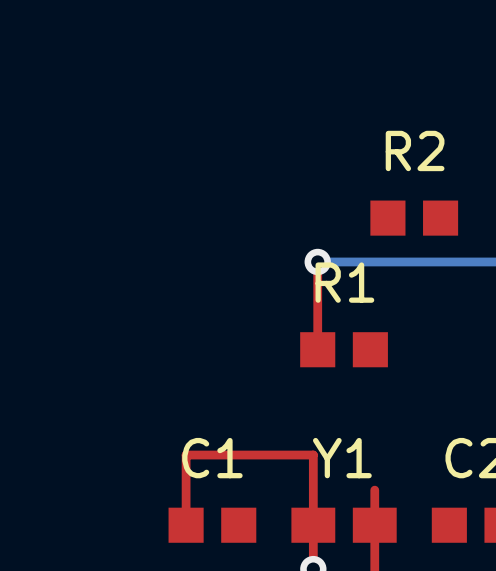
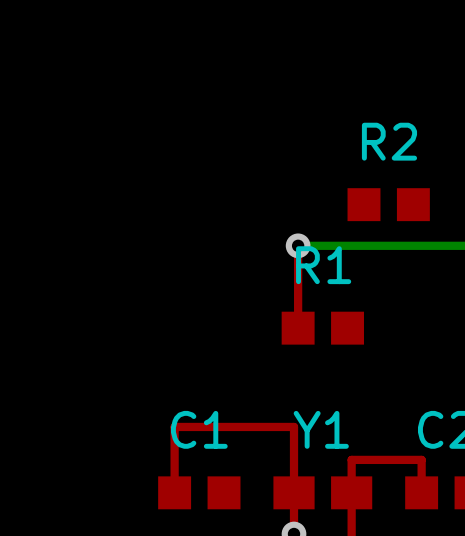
top track: none -> (351, 459) (421, 459) (421, 492)

